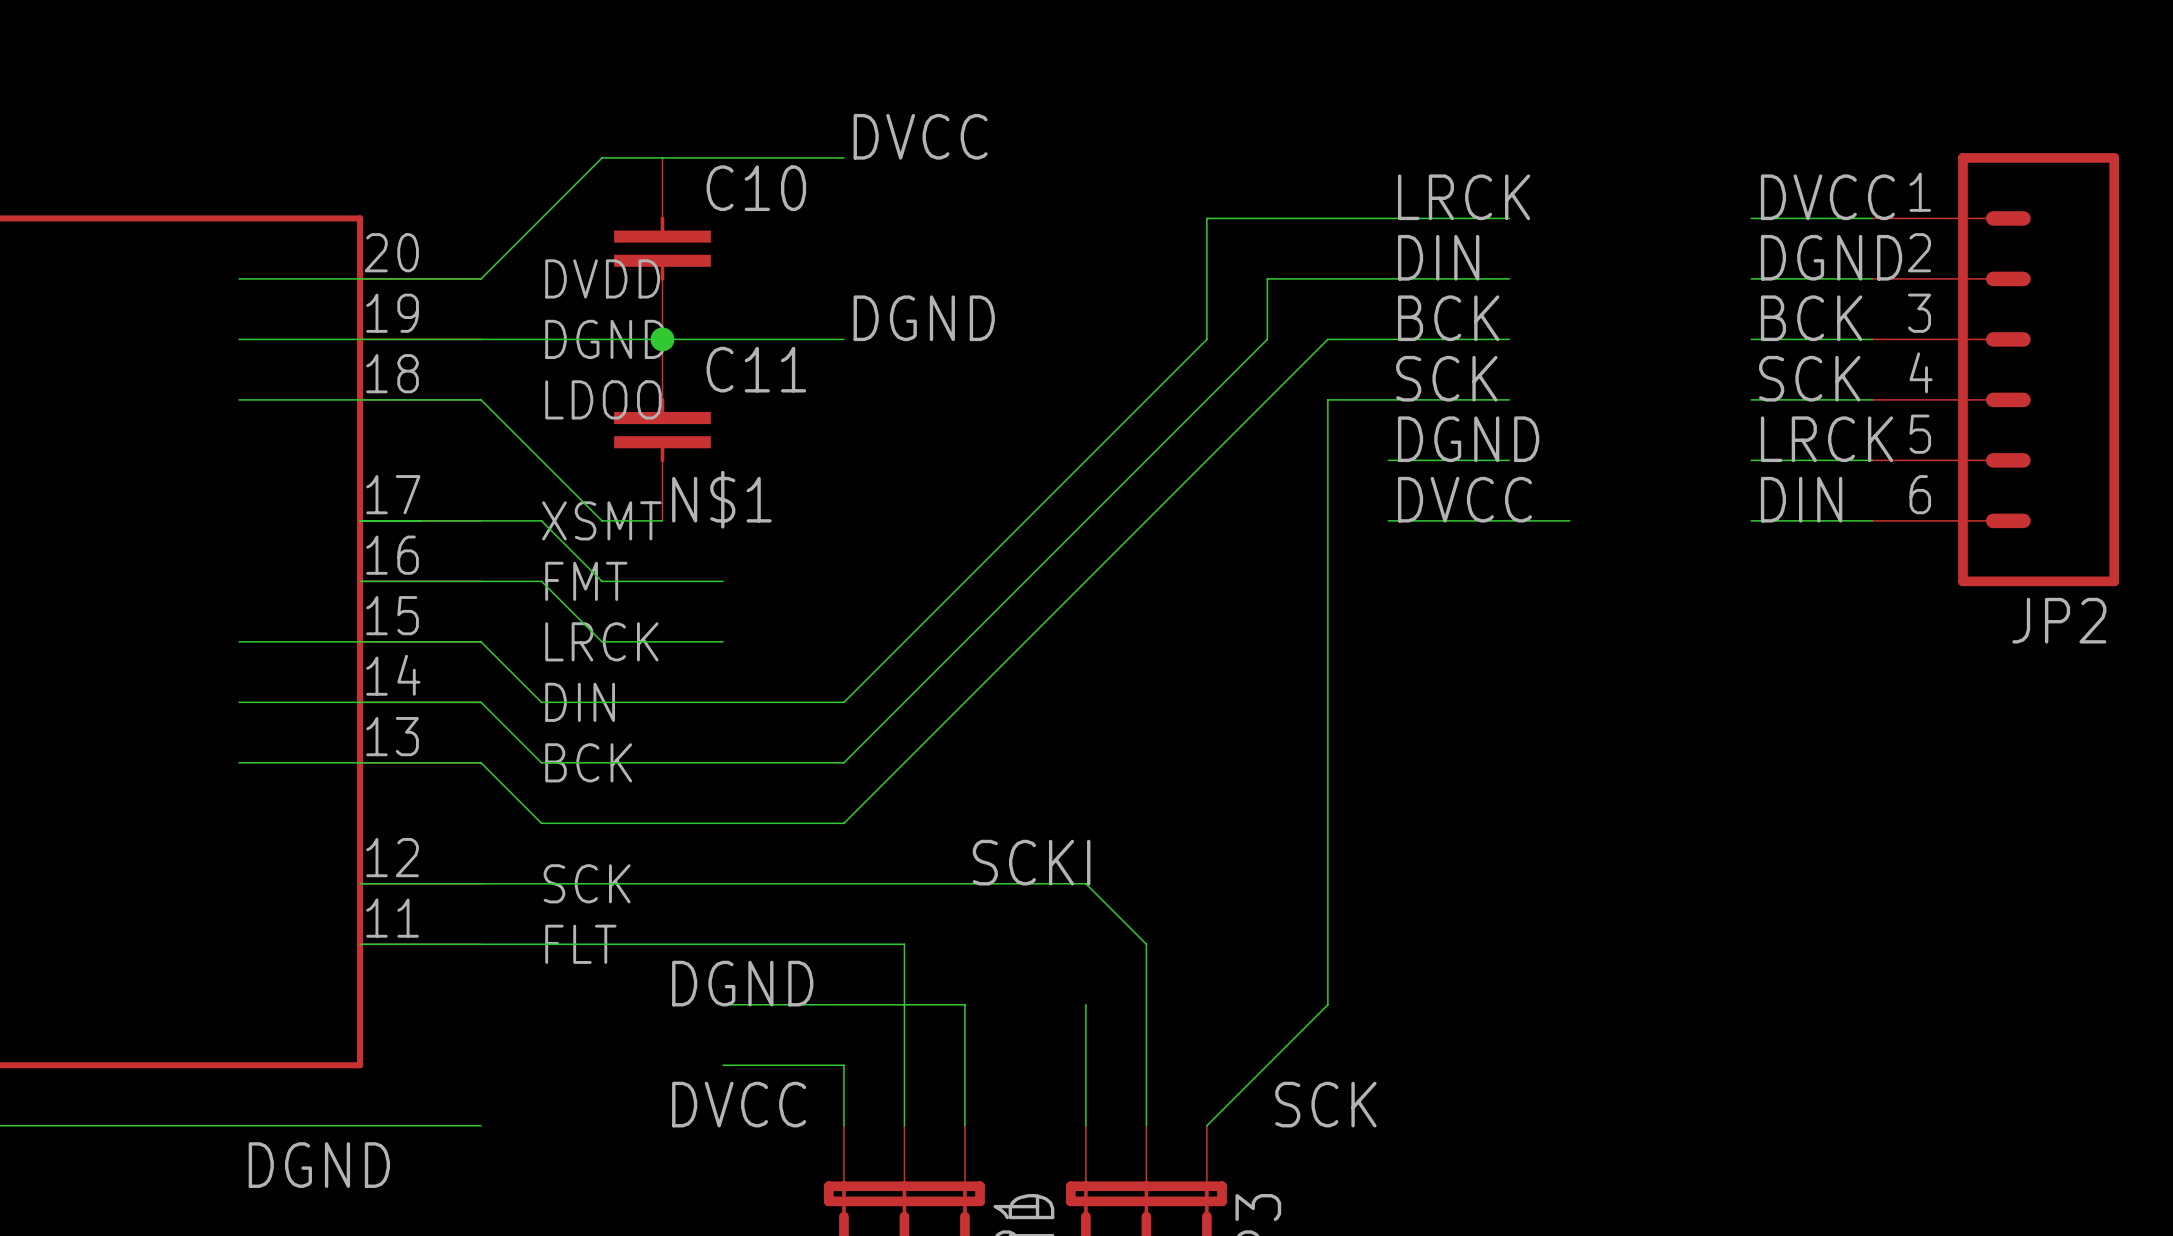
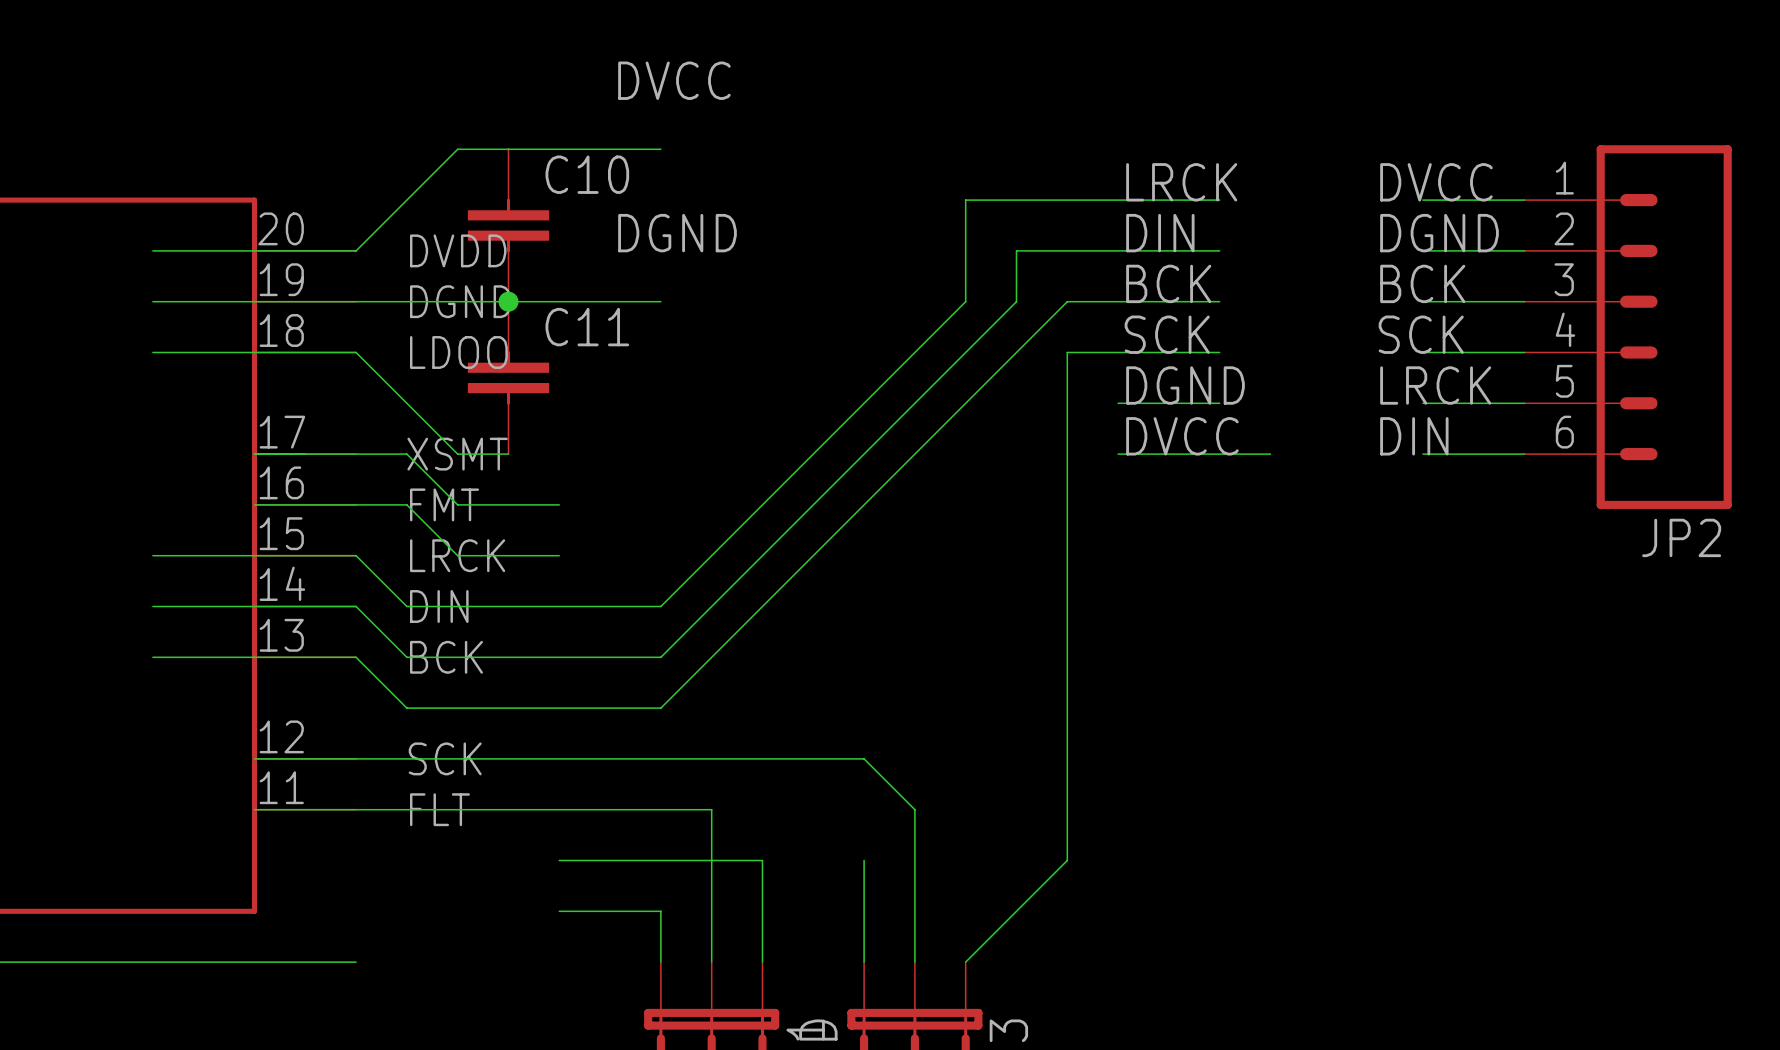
label position: DVCC (920, 136) -> DVCC (674, 80)
label position: DVCC (1827, 197) -> DVCC (1436, 182)
label position: DGND (1831, 257) -> DGND (1439, 233)
label position: DGND (924, 318) -> DGND (677, 233)
label position: BCK (1811, 318) -> BCK (1422, 283)
label position: SCK (1809, 378) -> SCK (1421, 334)
label position: LRCK (1827, 439) -> LRCK (1435, 385)
label: N$1 (721, 499) -> none
label position: DIN (1801, 499) -> DIN (1414, 436)
label: SCKI (1031, 862) -> none
label: DGND (742, 983) -> none
label: DVCC (739, 1104) -> none
label: SCK (1325, 1104) -> none
label: DGND (319, 1165) -> none

